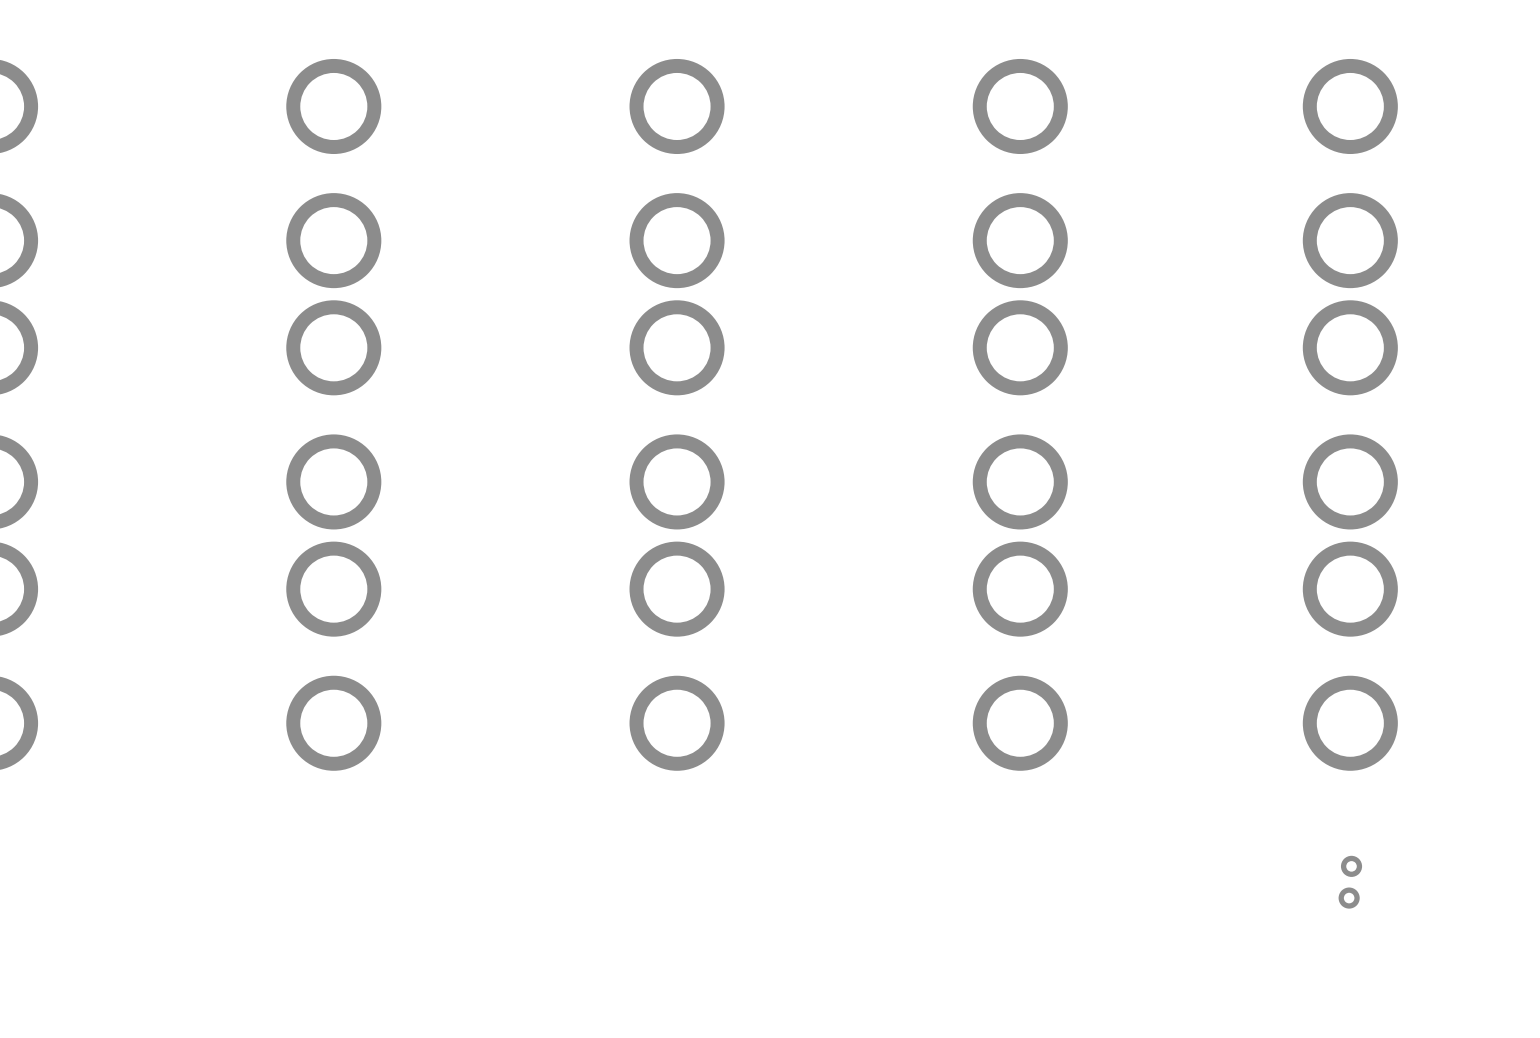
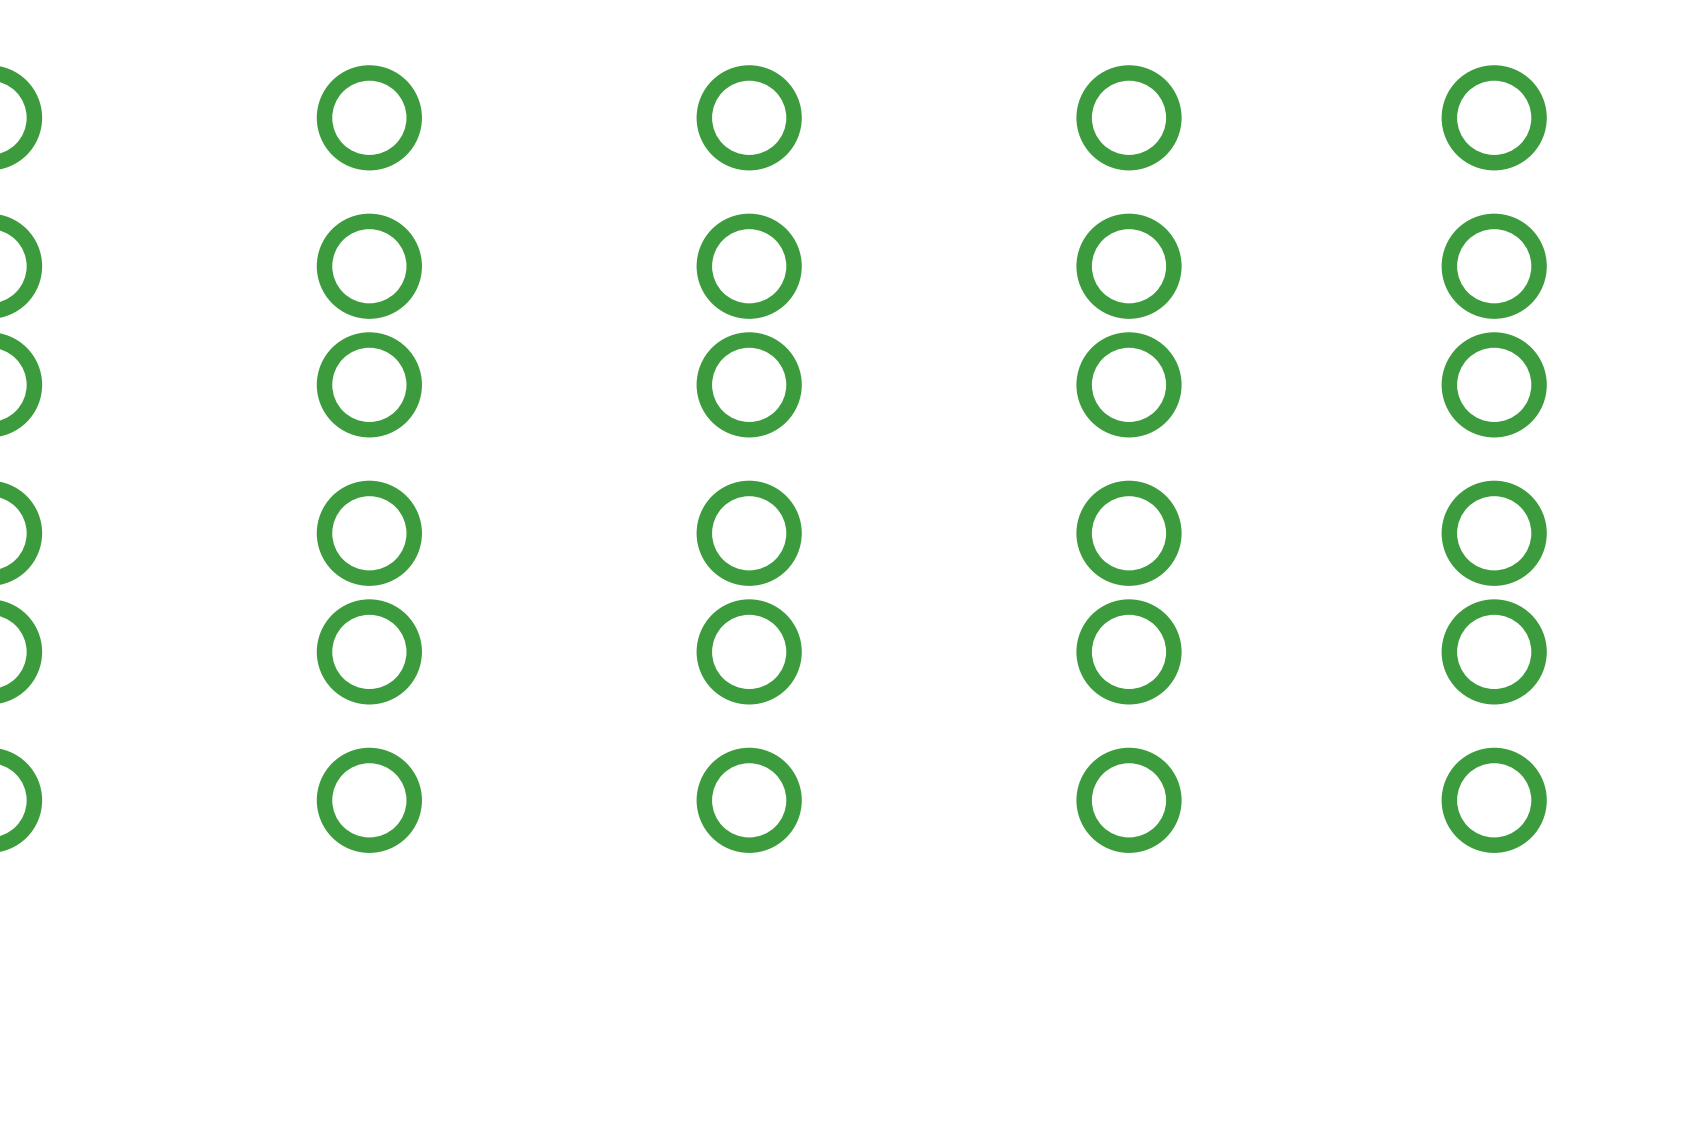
via: (1351, 866) -> none
via: (1349, 898) -> none

